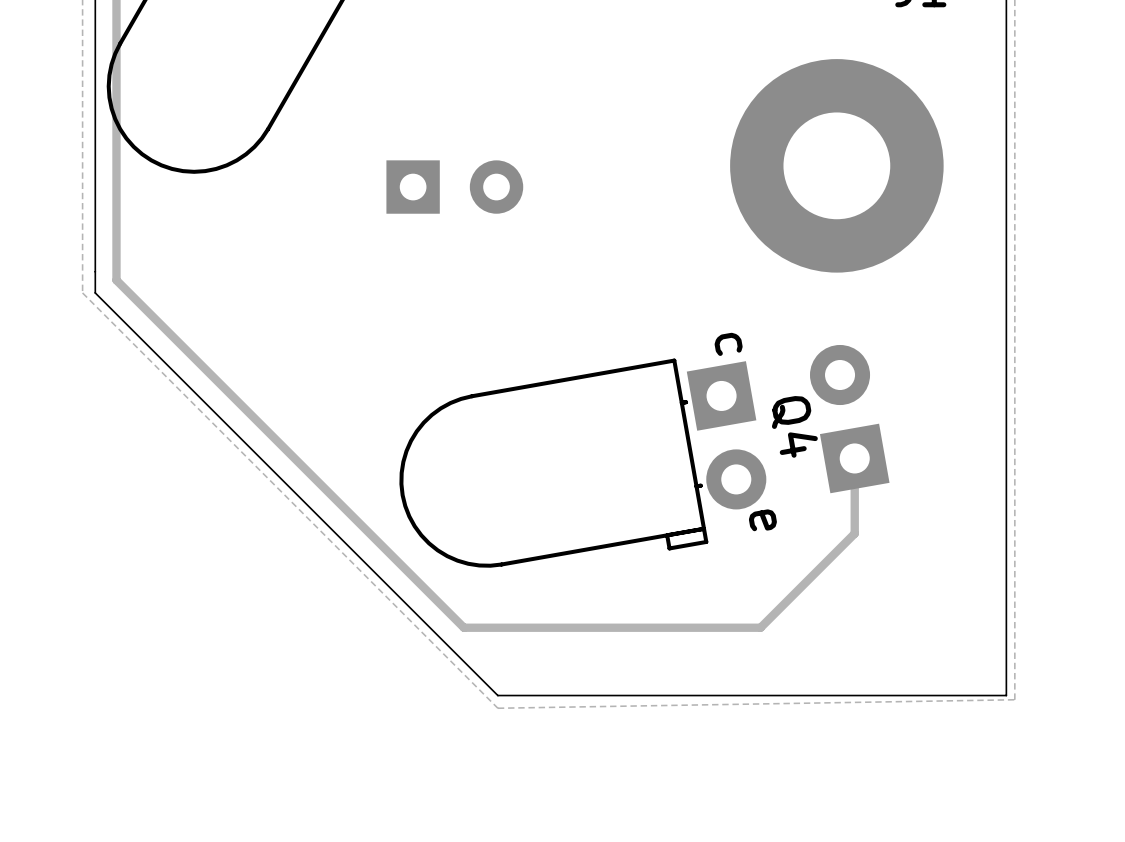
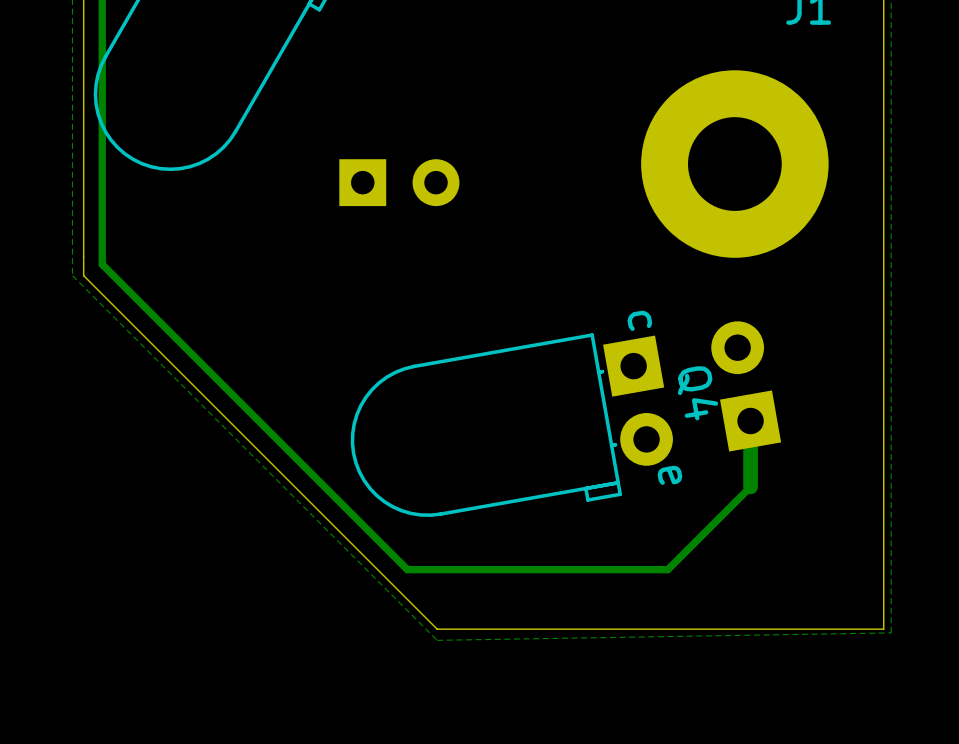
track width: thin (854, 458) (854, 533) -> thick (750, 421) (750, 486)

